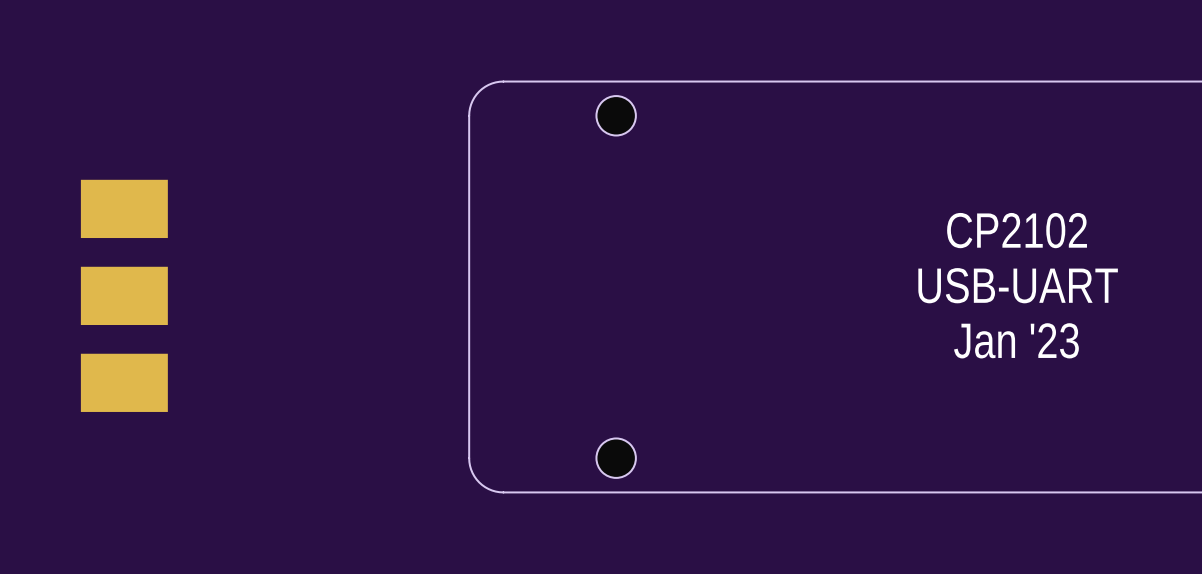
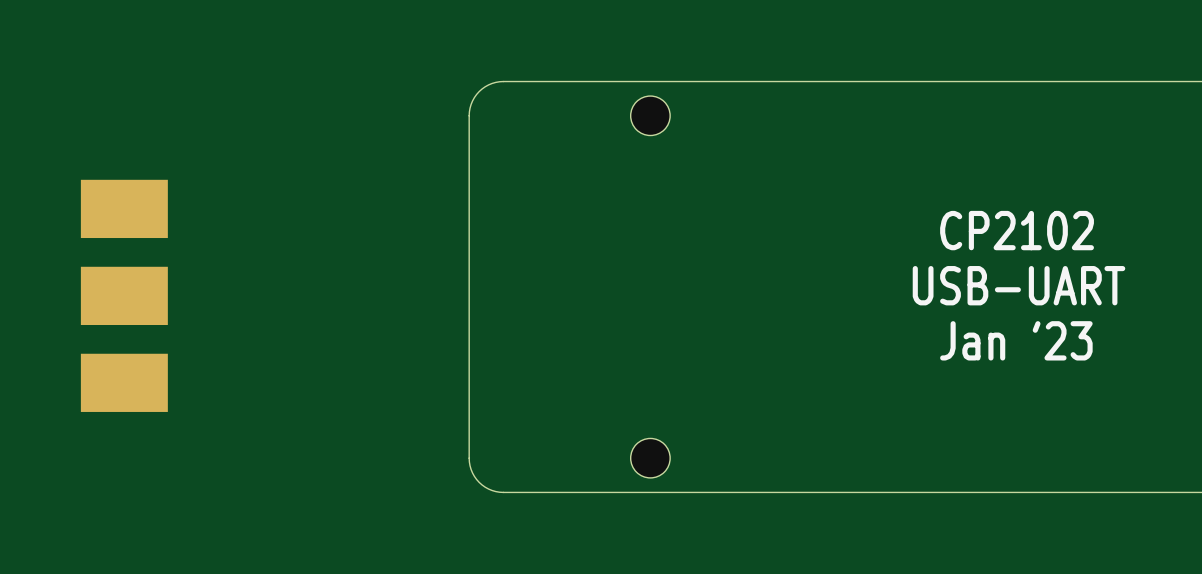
part position: (616, 115) -> (650, 115)
part position: (616, 458) -> (650, 458)

